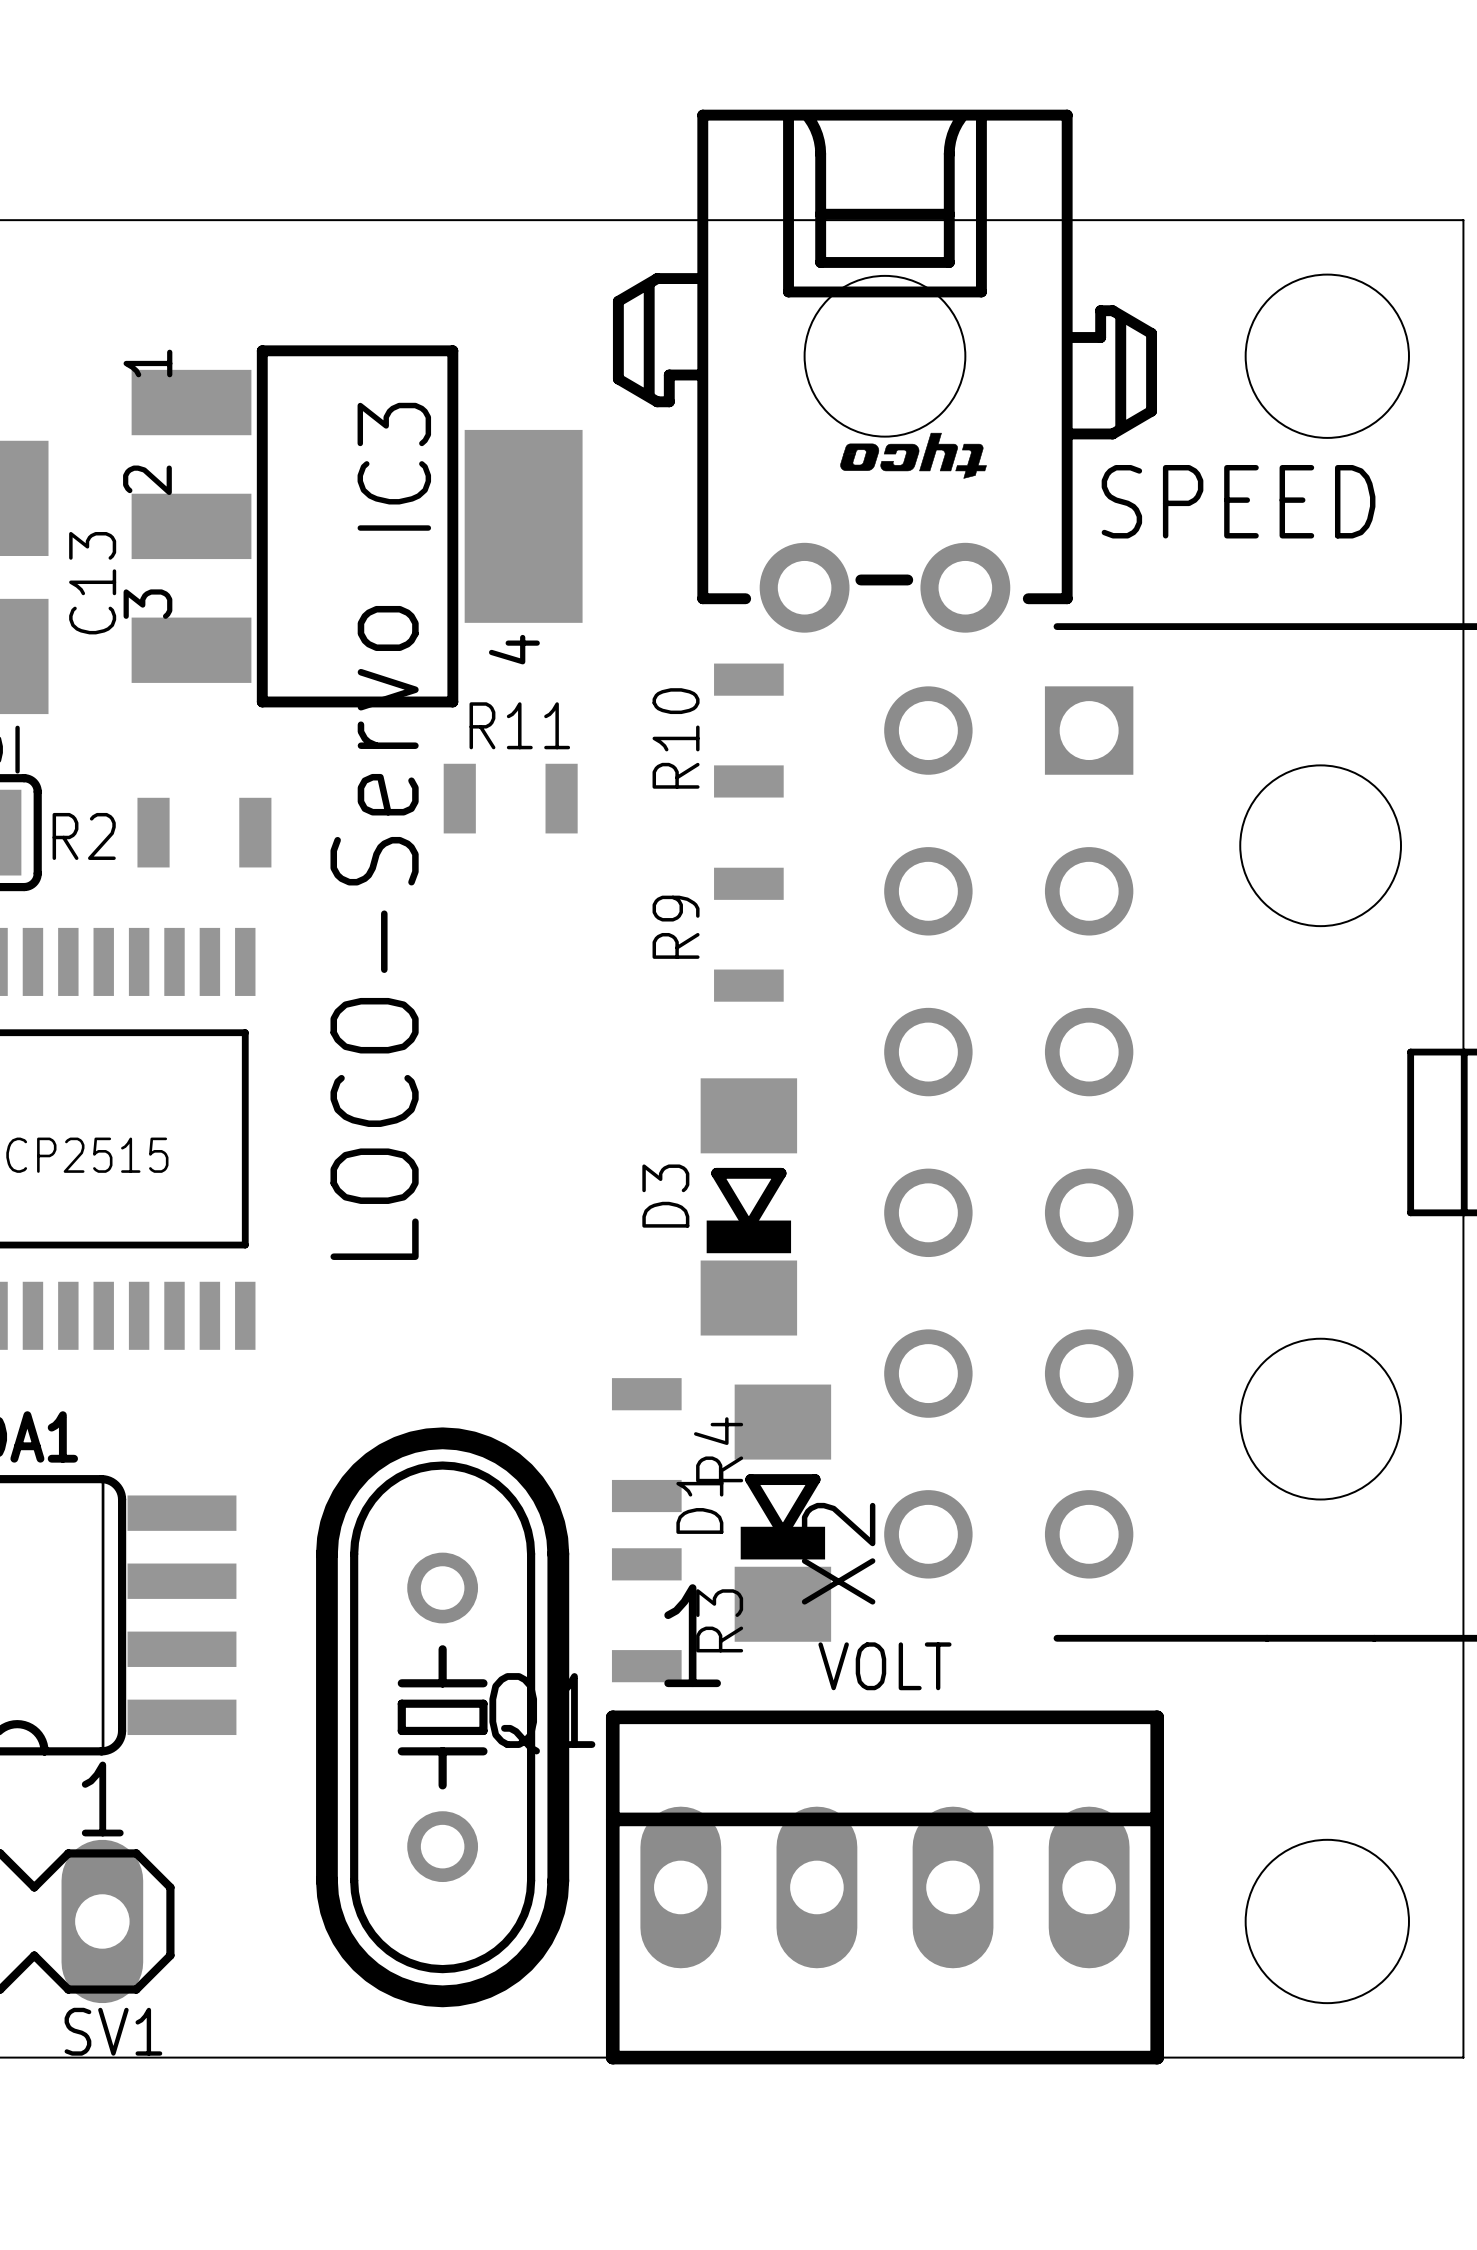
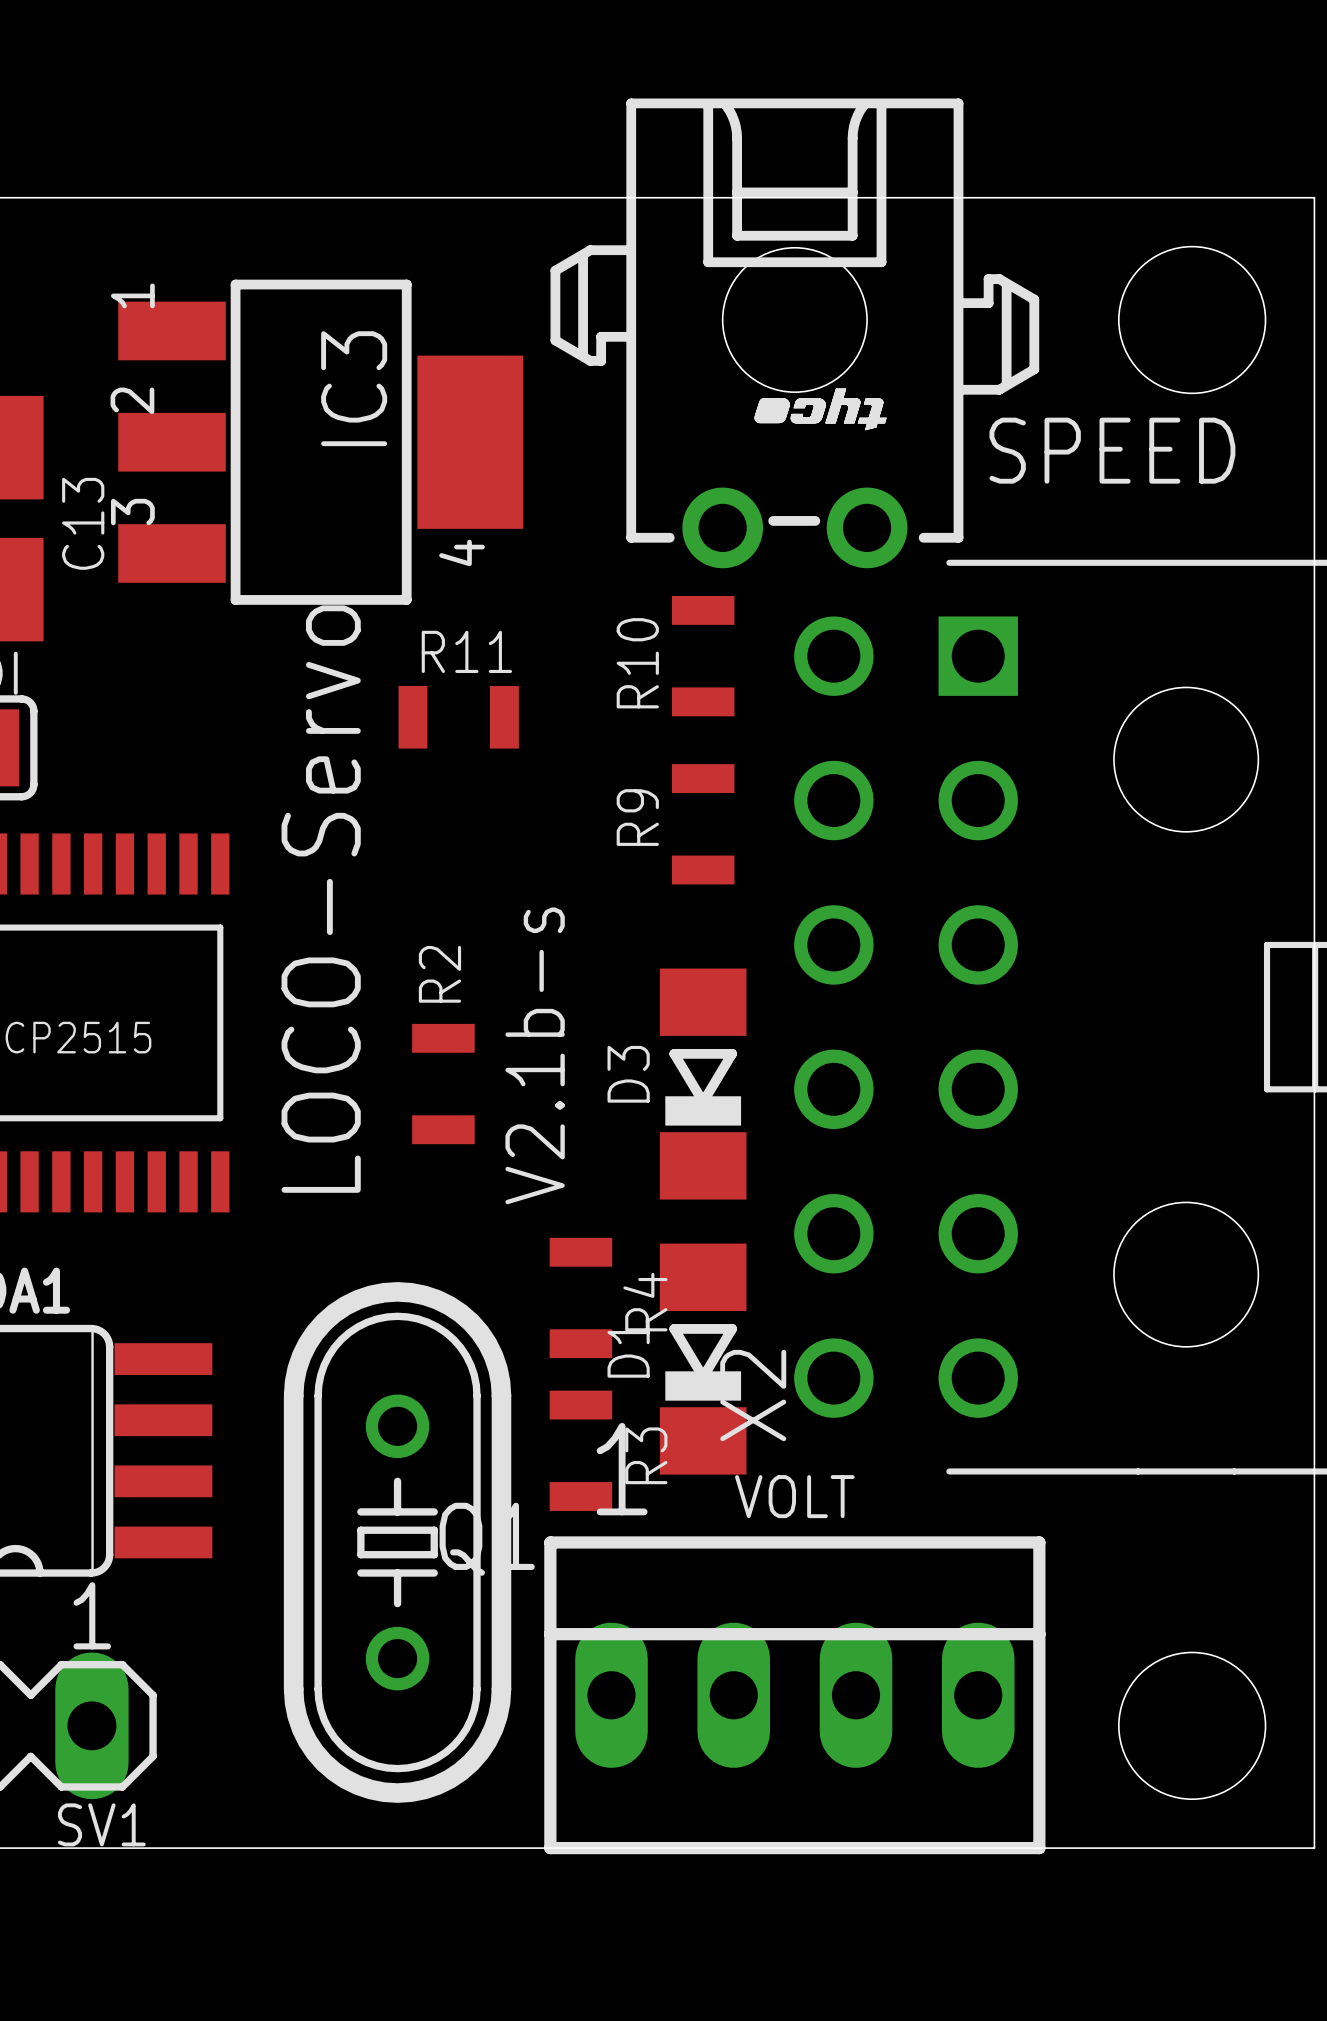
SPEED footprint: [612, 109, 1158, 633] -> [550, 98, 1040, 569]
IC3 position: (357, 526) -> (320, 442)
R10 position: (748, 730) -> (703, 656)
R2 rotation: 0° (204, 832) -> 90° clockwise (443, 1084)
R2 position: (204, 832) -> (443, 1084)
text position: LOCO-Servo (374, 932) -> LOCO-Servo (321, 899)
R9 position: (748, 934) -> (703, 824)
text: none -> V2.1b-s (535, 1055)
D3 position: (748, 1206) -> (703, 1084)

